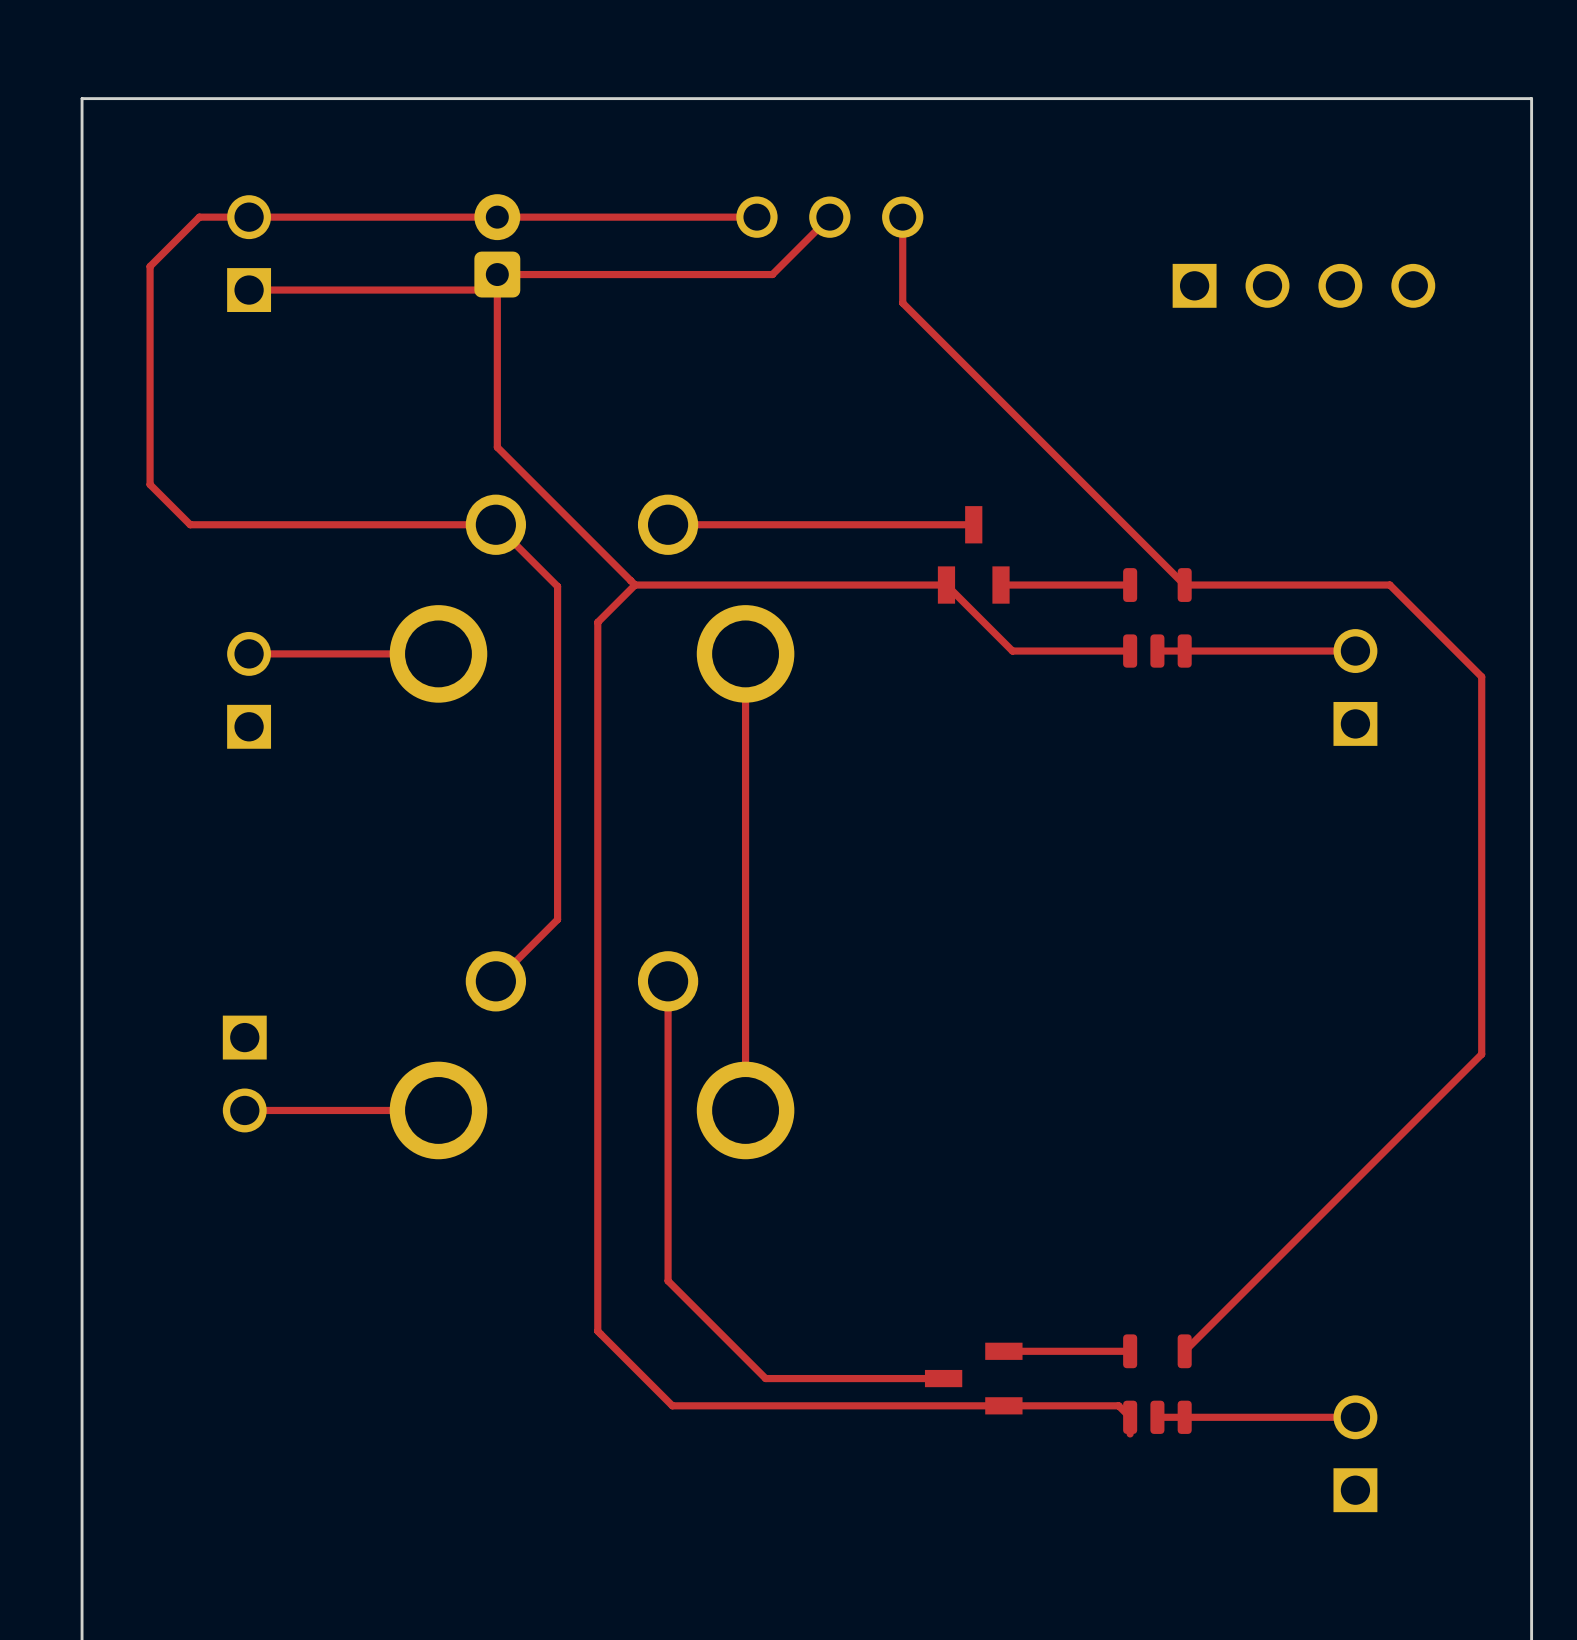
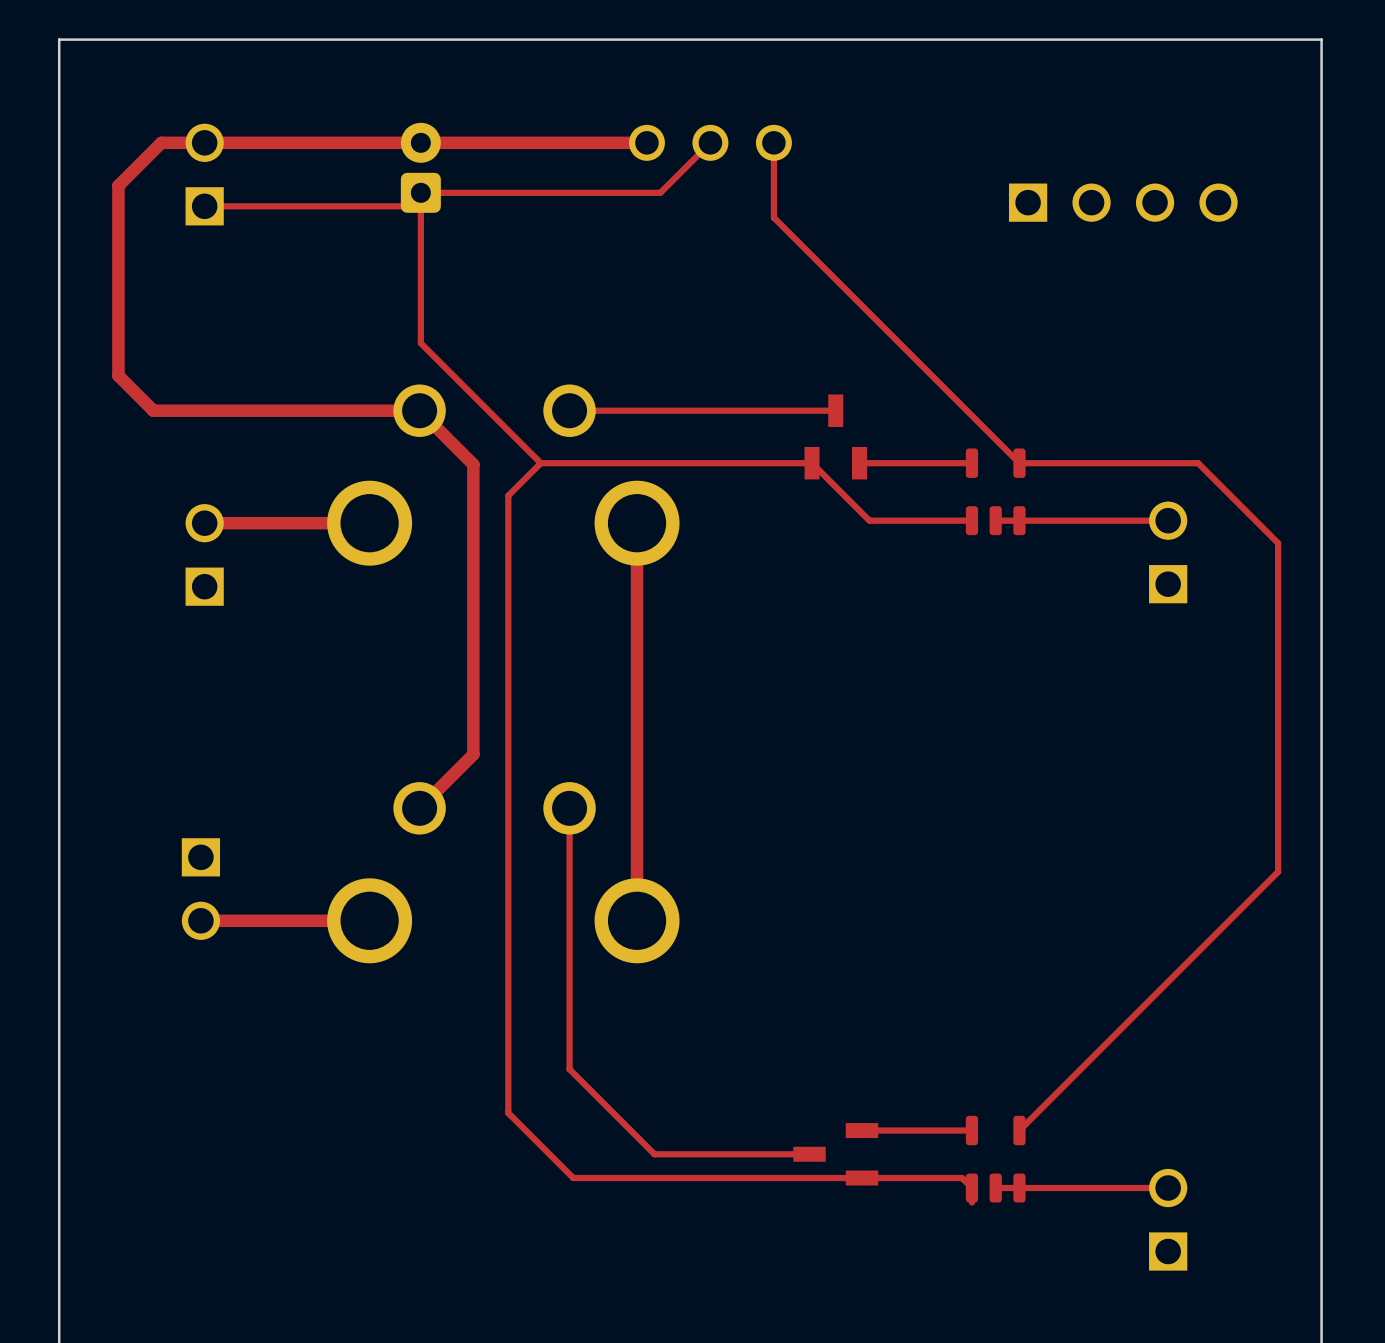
top track width: thin (756, 217) (199, 217) (150, 266) (150, 484) (190, 524) (495, 524) (557, 586) (557, 919) (495, 981) -> thick (646, 142) (161, 142) (118, 185) (118, 375) (153, 410) (419, 410) (473, 464) (473, 754) (419, 808)
top track width: thin (438, 653) (249, 653) -> thick (369, 523) (204, 523)
top track width: thin (745, 653) (745, 1110) -> thick (637, 523) (637, 920)
top track width: thin (438, 1110) (244, 1110) -> thick (369, 920) (200, 920)

